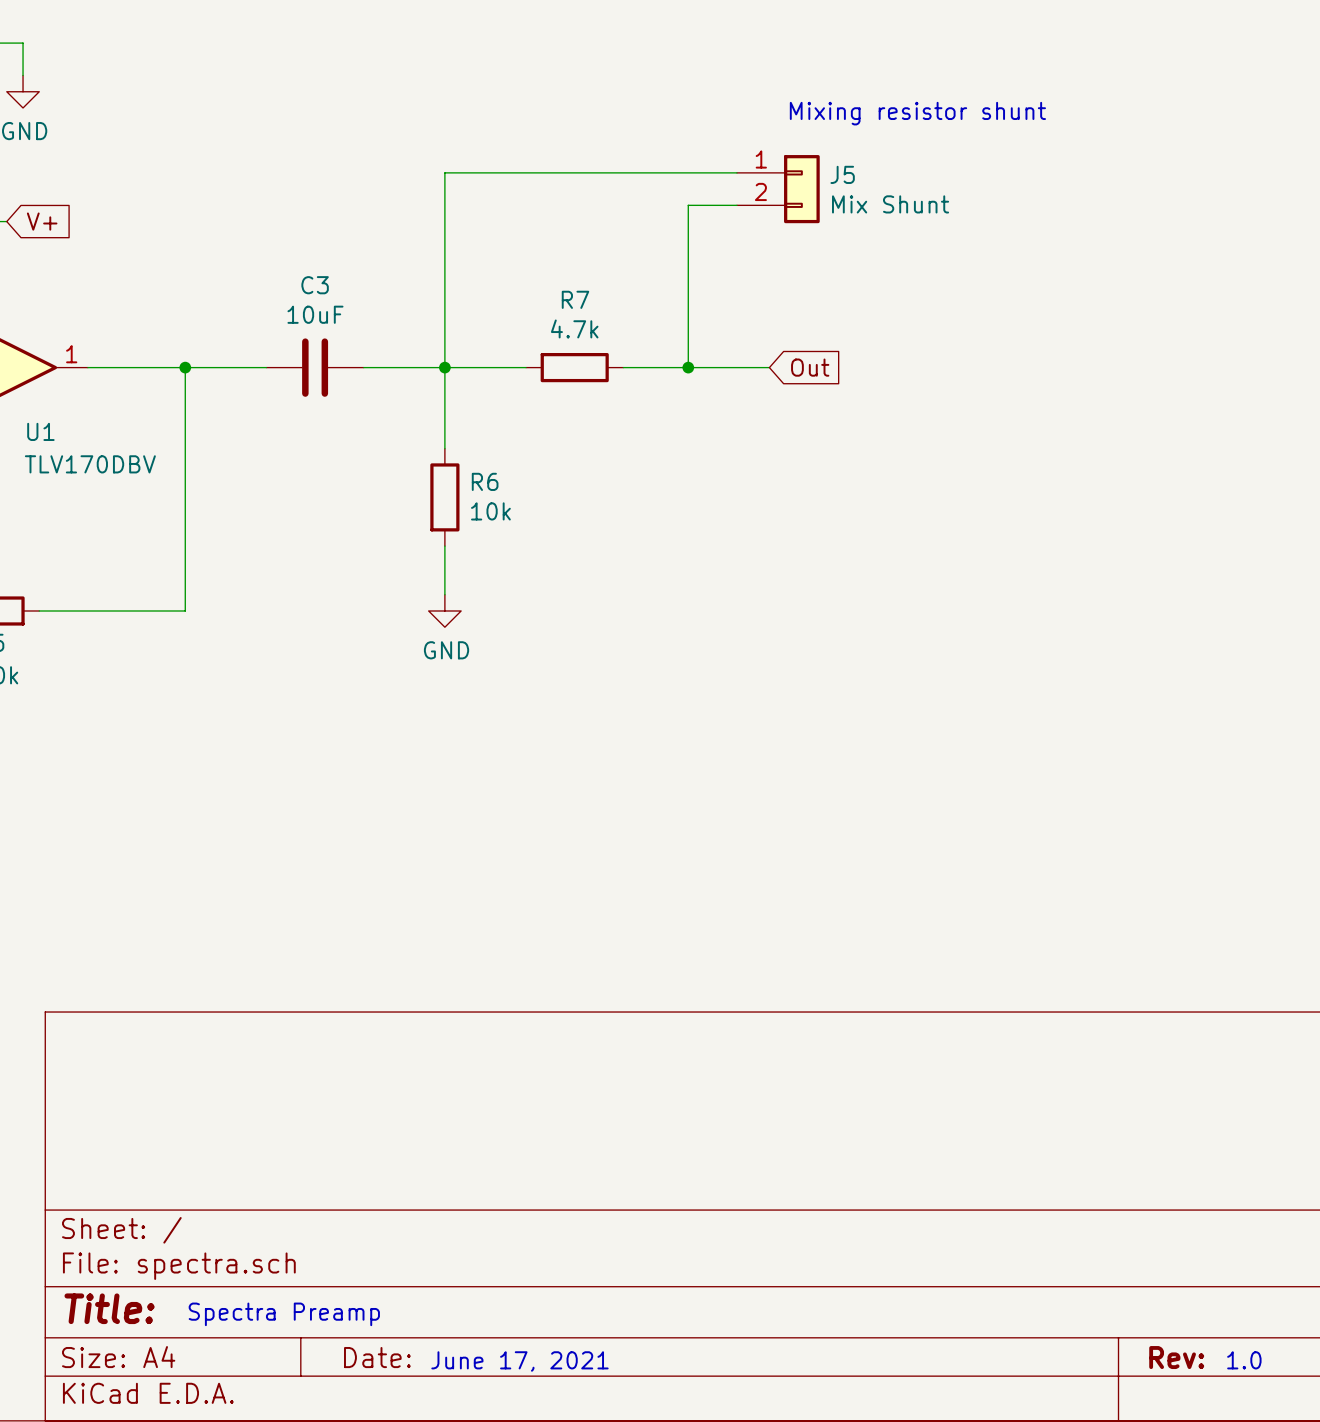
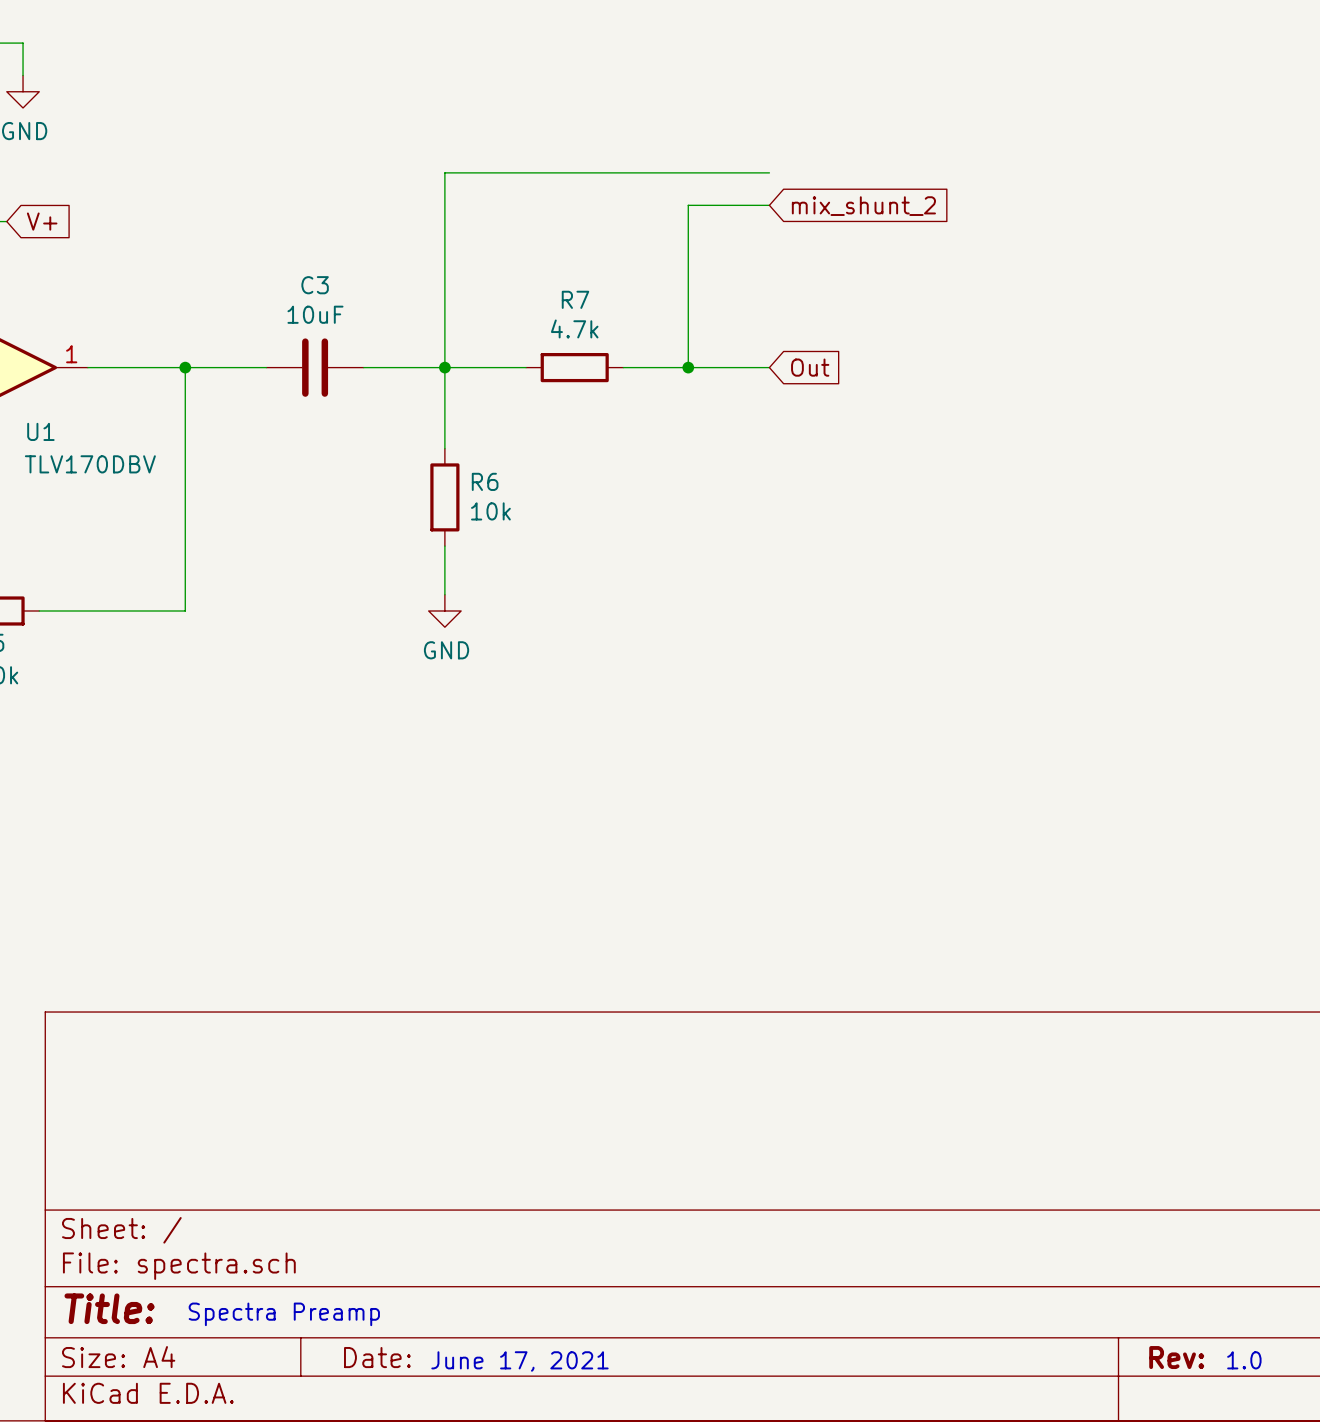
text: Mixing resistor shunt (917, 113) -> none
J5: Mix Shunt (778, 189) -> none
global label: none -> mix_shunt_2 (863, 206)

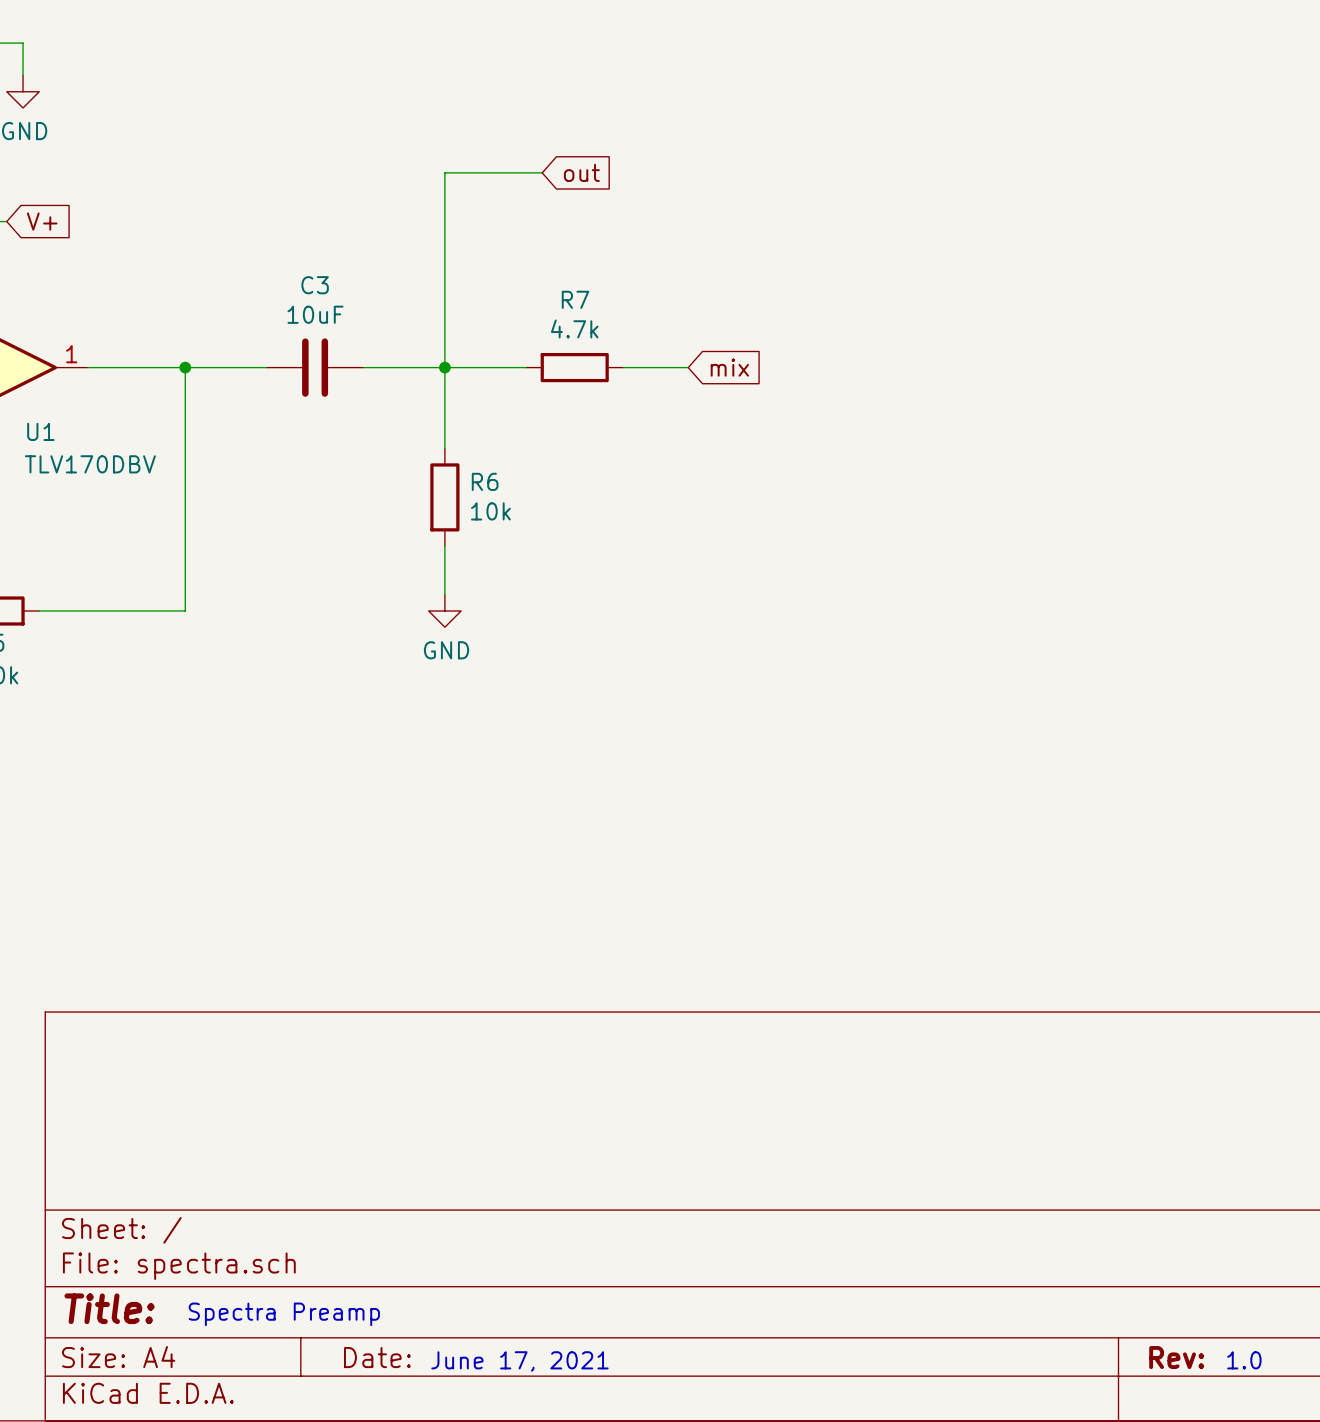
wire: (542, 172) (769, 172) -> none
global label: none -> out (581, 172)
wire: (769, 205) (688, 205) (688, 367) (769, 367) -> none
global label: mix_shunt_2 (863, 206) -> none
junction: (688, 367) -> none
global label: none -> mix (729, 367)
global label: Out (810, 367) -> none

